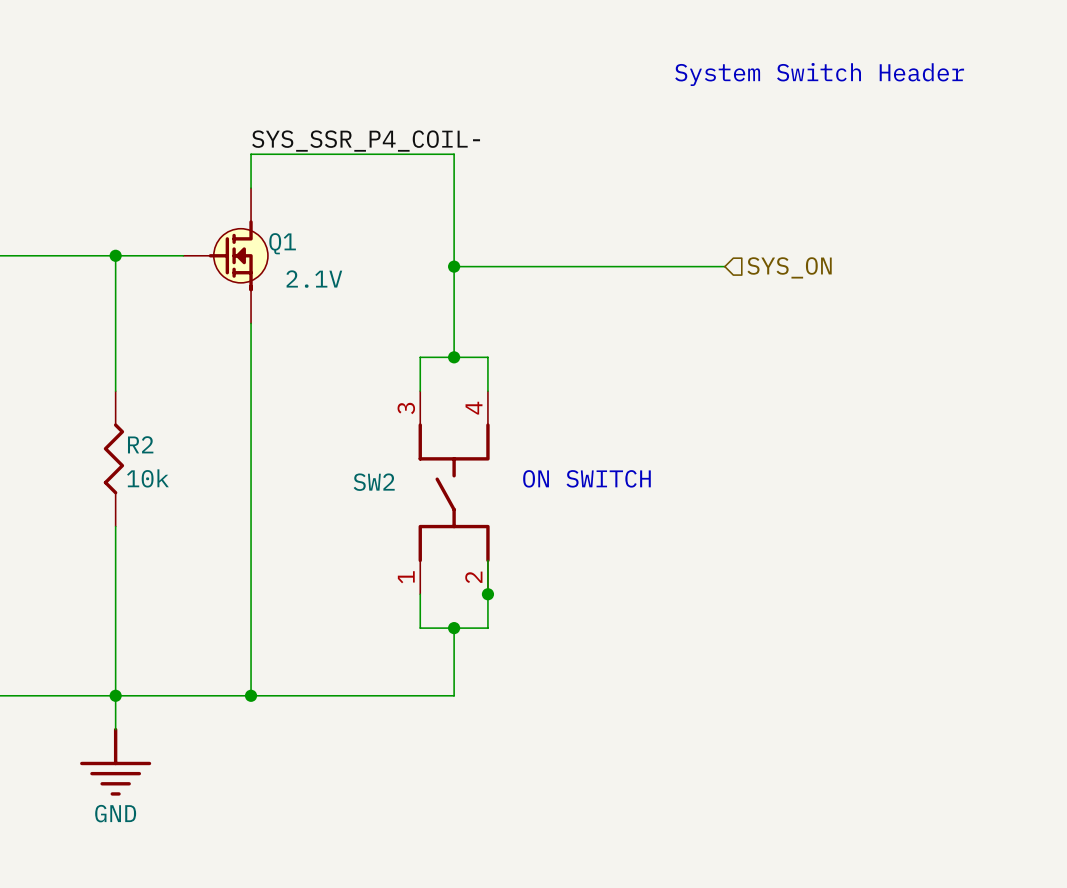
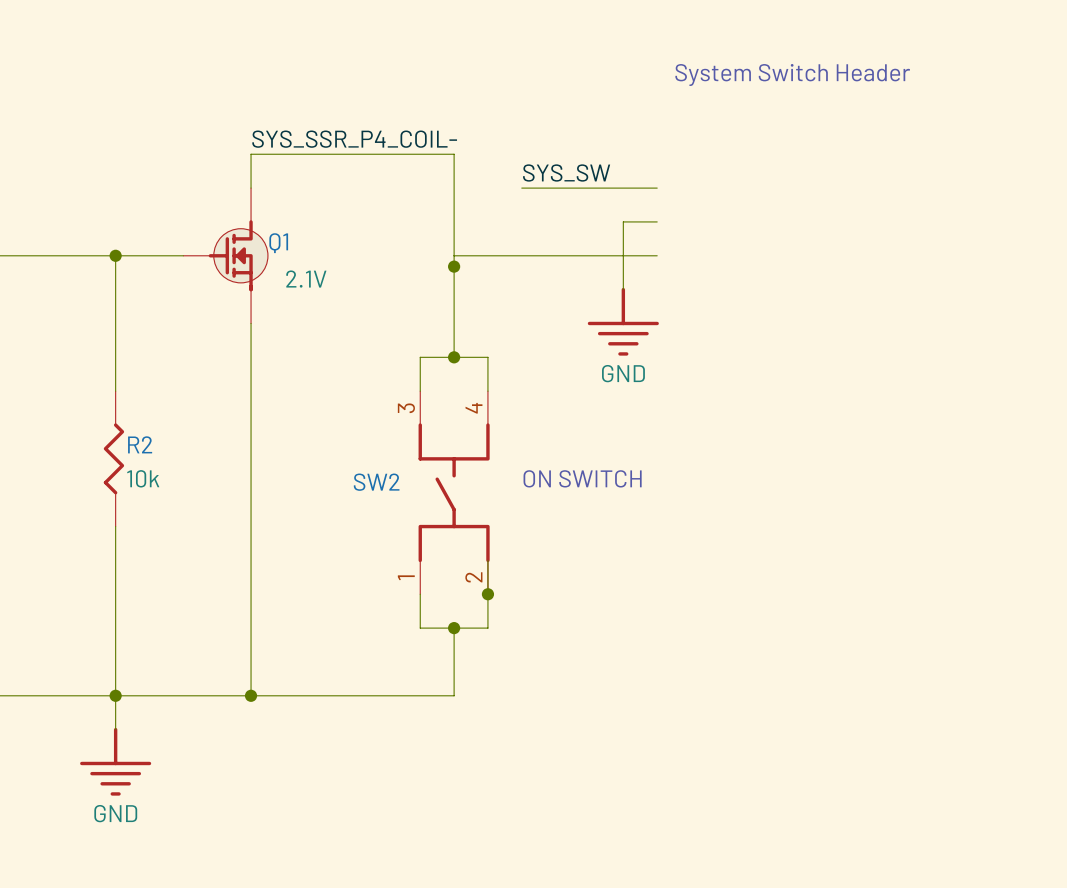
label: none -> SYS_SW (566, 172)
wire: none -> (521, 188) (657, 188)
wire: none -> (657, 221) (623, 221) (623, 289)
wire: none -> (454, 255) (657, 255)
wire: (454, 266) (724, 266) -> none
hierarchical label: SYS_ON (789, 267) -> none
power symbol: none -> GND (623, 321)

